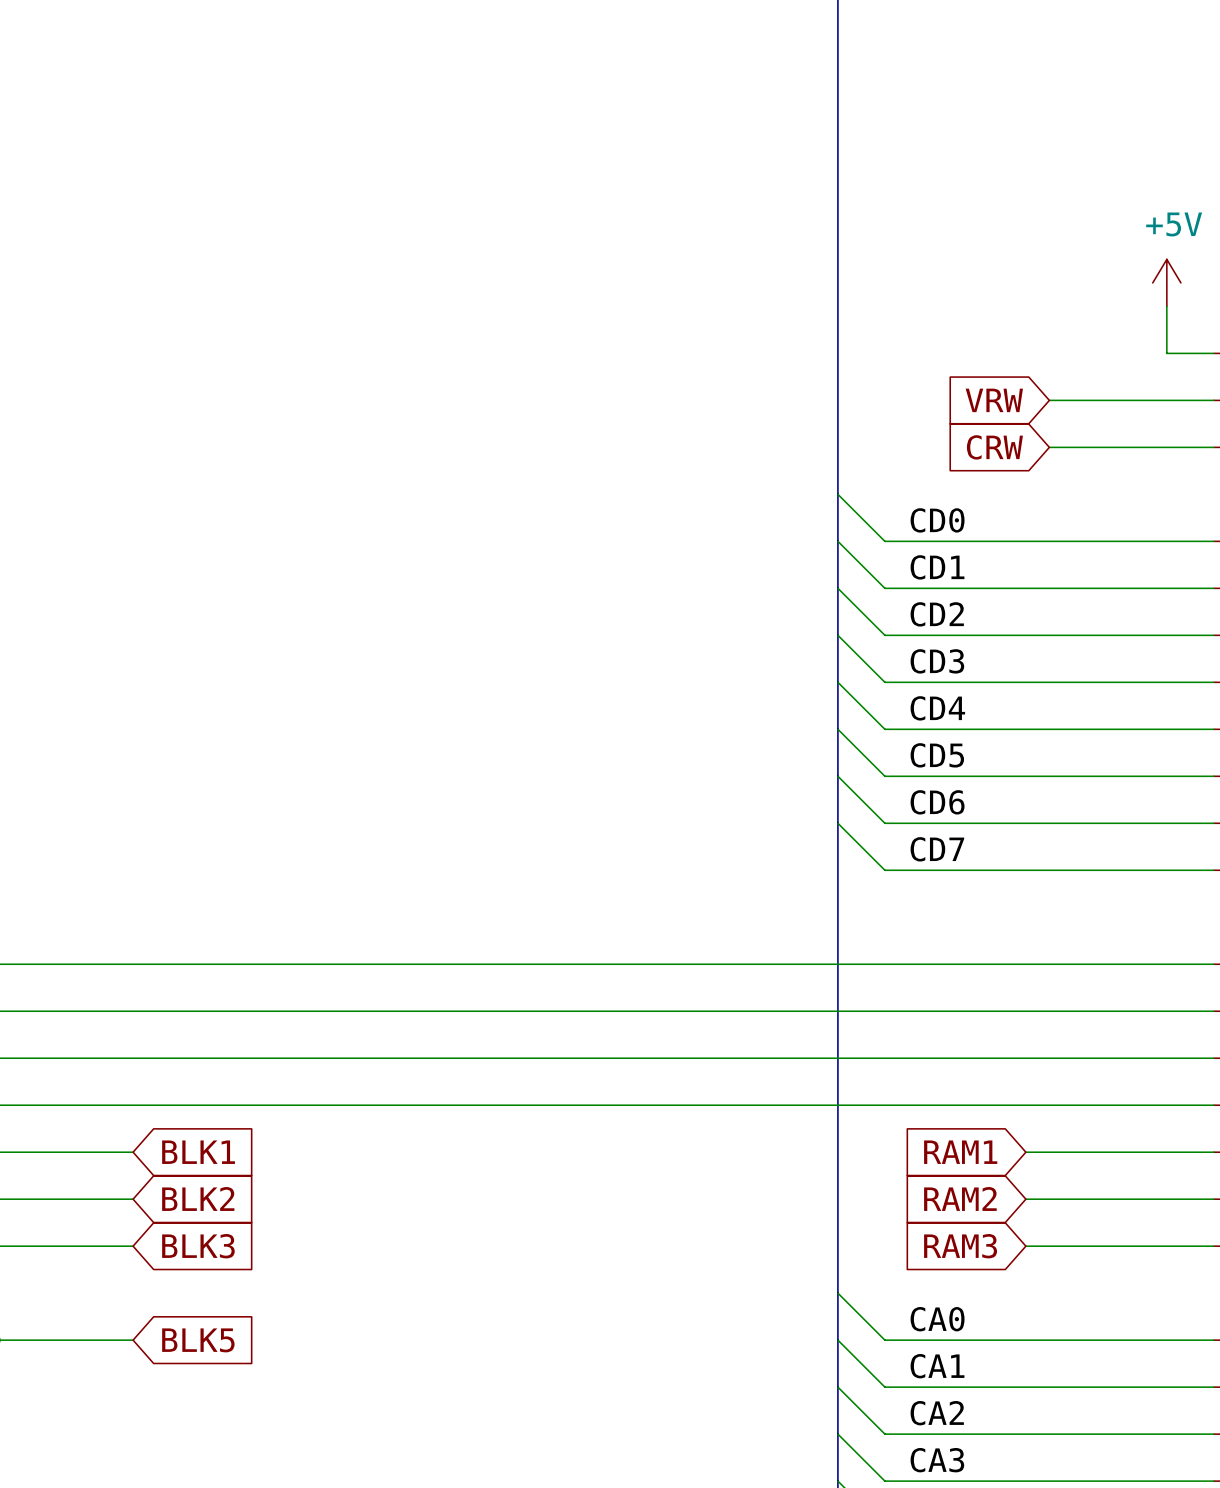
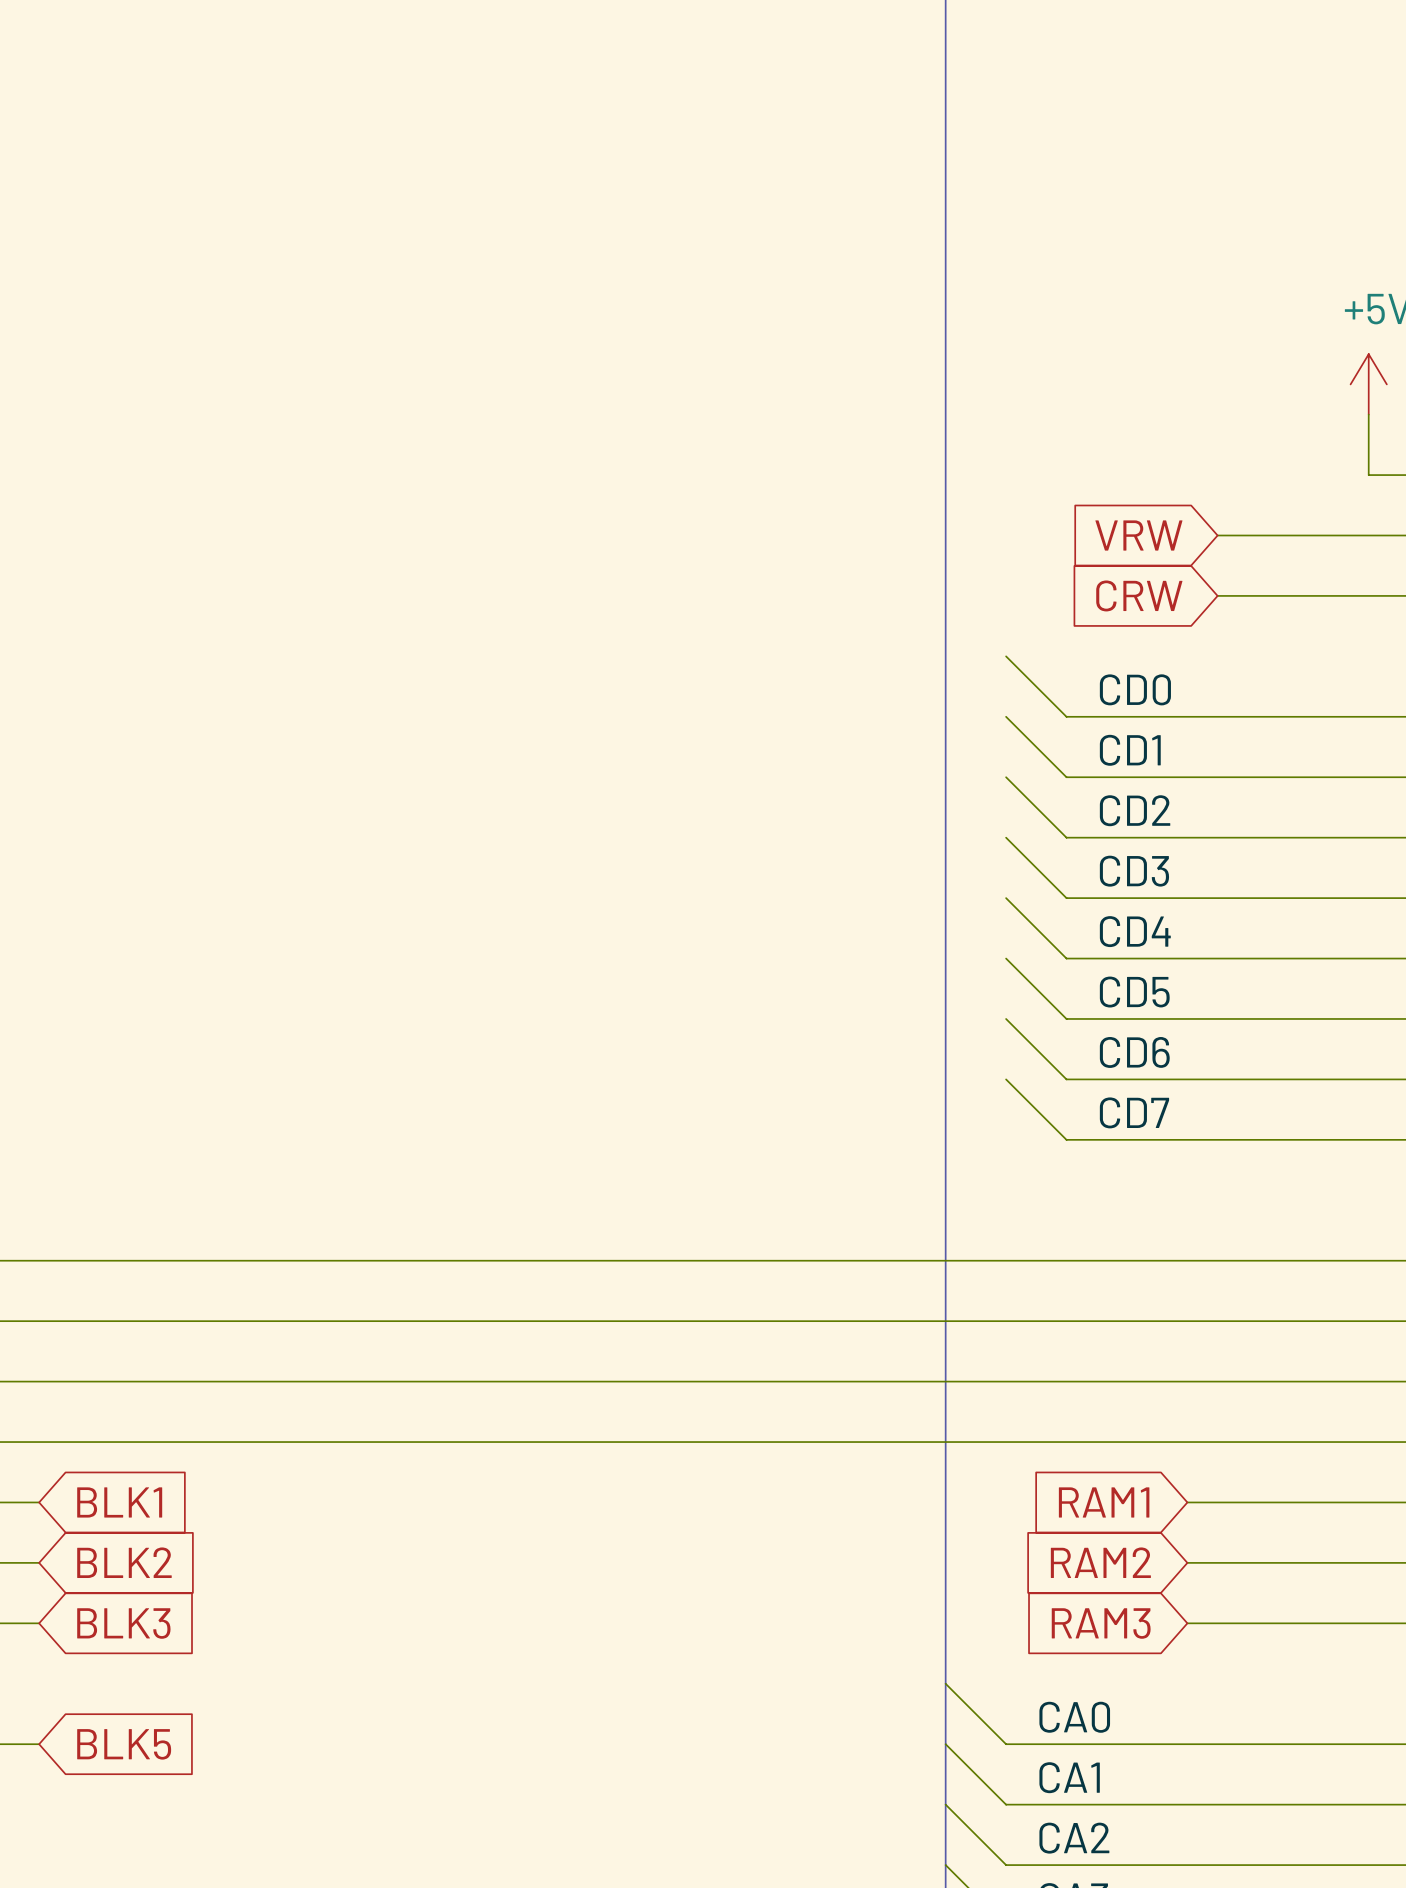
wire: (837, 494) (884, 541) (931, 541) -> (1006, 656) (1066, 716)
label position: CD0 (937, 520) -> CD0 (1135, 689)
wire: (837, 541) (884, 588) (931, 588) -> (1006, 716) (1066, 777)
label position: CD1 (937, 567) -> CD1 (1130, 750)
wire: (837, 588) (884, 635) (931, 635) -> (1006, 777) (1066, 837)
label position: CD2 (937, 614) -> CD2 (1135, 810)
wire: (837, 635) (884, 682) (931, 682) -> (1006, 837) (1066, 898)
label position: CD3 (937, 661) -> CD3 (1134, 871)
wire: (837, 682) (884, 729) (931, 729) -> (1006, 898) (1066, 958)
label position: CD4 (937, 708) -> CD4 (1135, 931)
wire: (837, 729) (884, 776) (931, 776) -> (1006, 958) (1066, 1018)
label position: CD5 (937, 755) -> CD5 (1134, 992)
wire: (837, 776) (884, 823) (931, 823) -> (1006, 1018) (1066, 1079)
label position: CD6 (937, 802) -> CD6 (1134, 1052)
wire: (837, 823) (884, 870) (931, 870) -> (1006, 1079) (1066, 1139)
label position: CD7 (937, 849) -> CD7 (1134, 1112)

